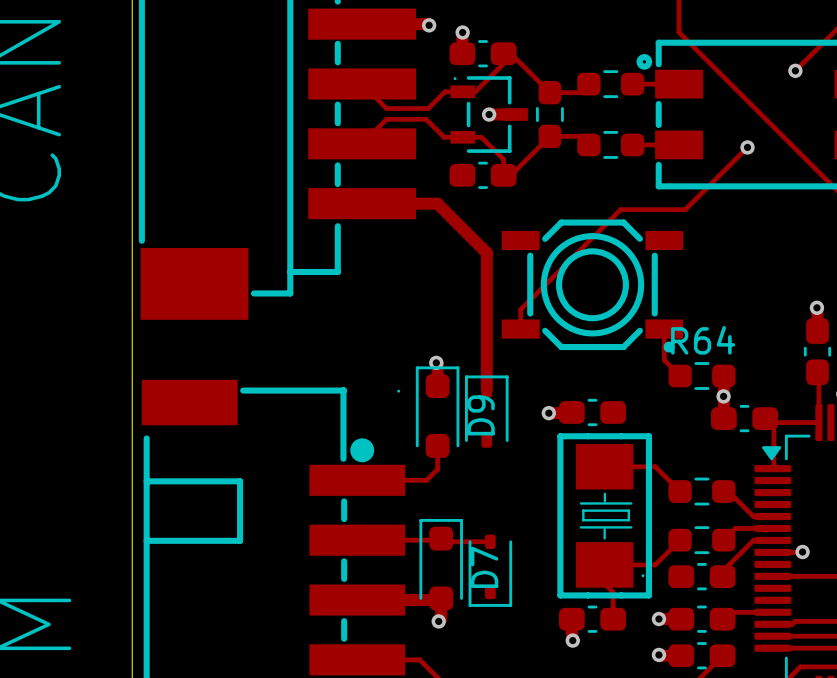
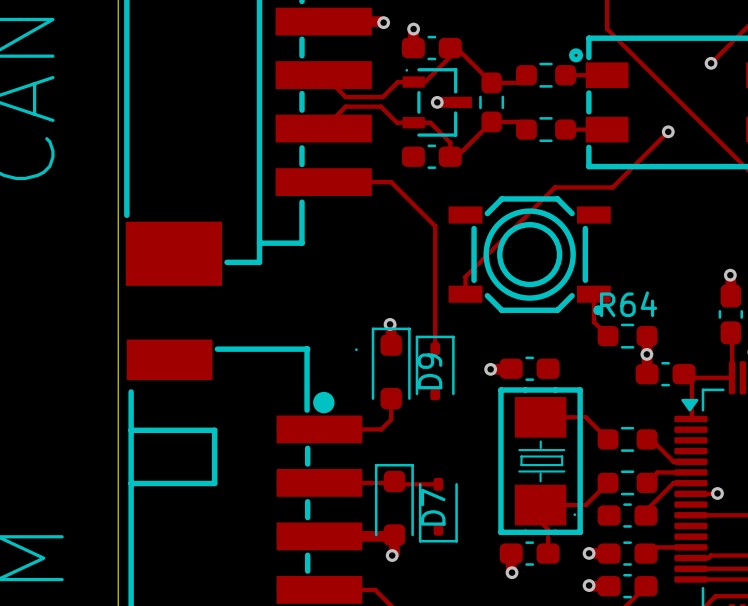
track width: thick (362, 203) (437, 203) (486, 252) (486, 390) -> thin (323, 182) (391, 182) (435, 226) (435, 348)

